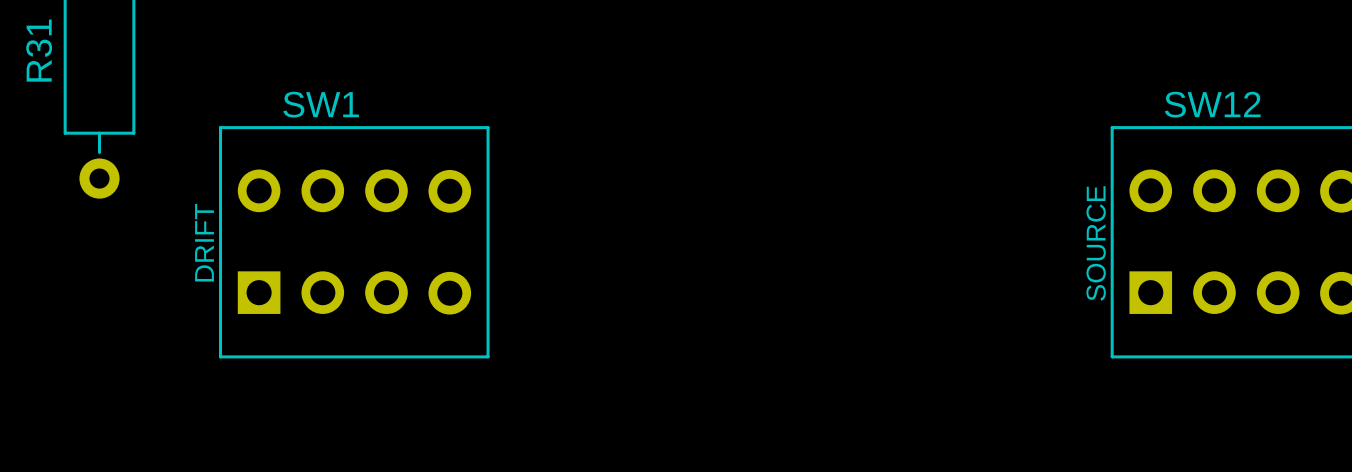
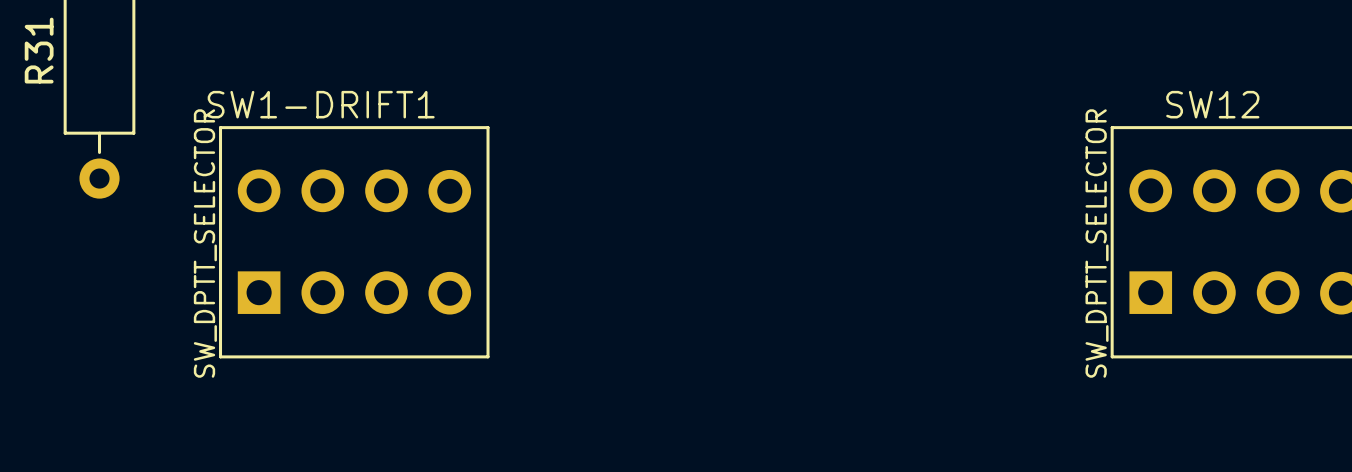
SW1 name: SW1 (321, 104) -> SW1-DRIFT1 (321, 104)
SW1 value: DRIFT (204, 242) -> SW_DPTT_SELECTOR (205, 243)
SW12 value: SOURCE (1096, 243) -> SW_DPTT_SELECTOR (1097, 243)

